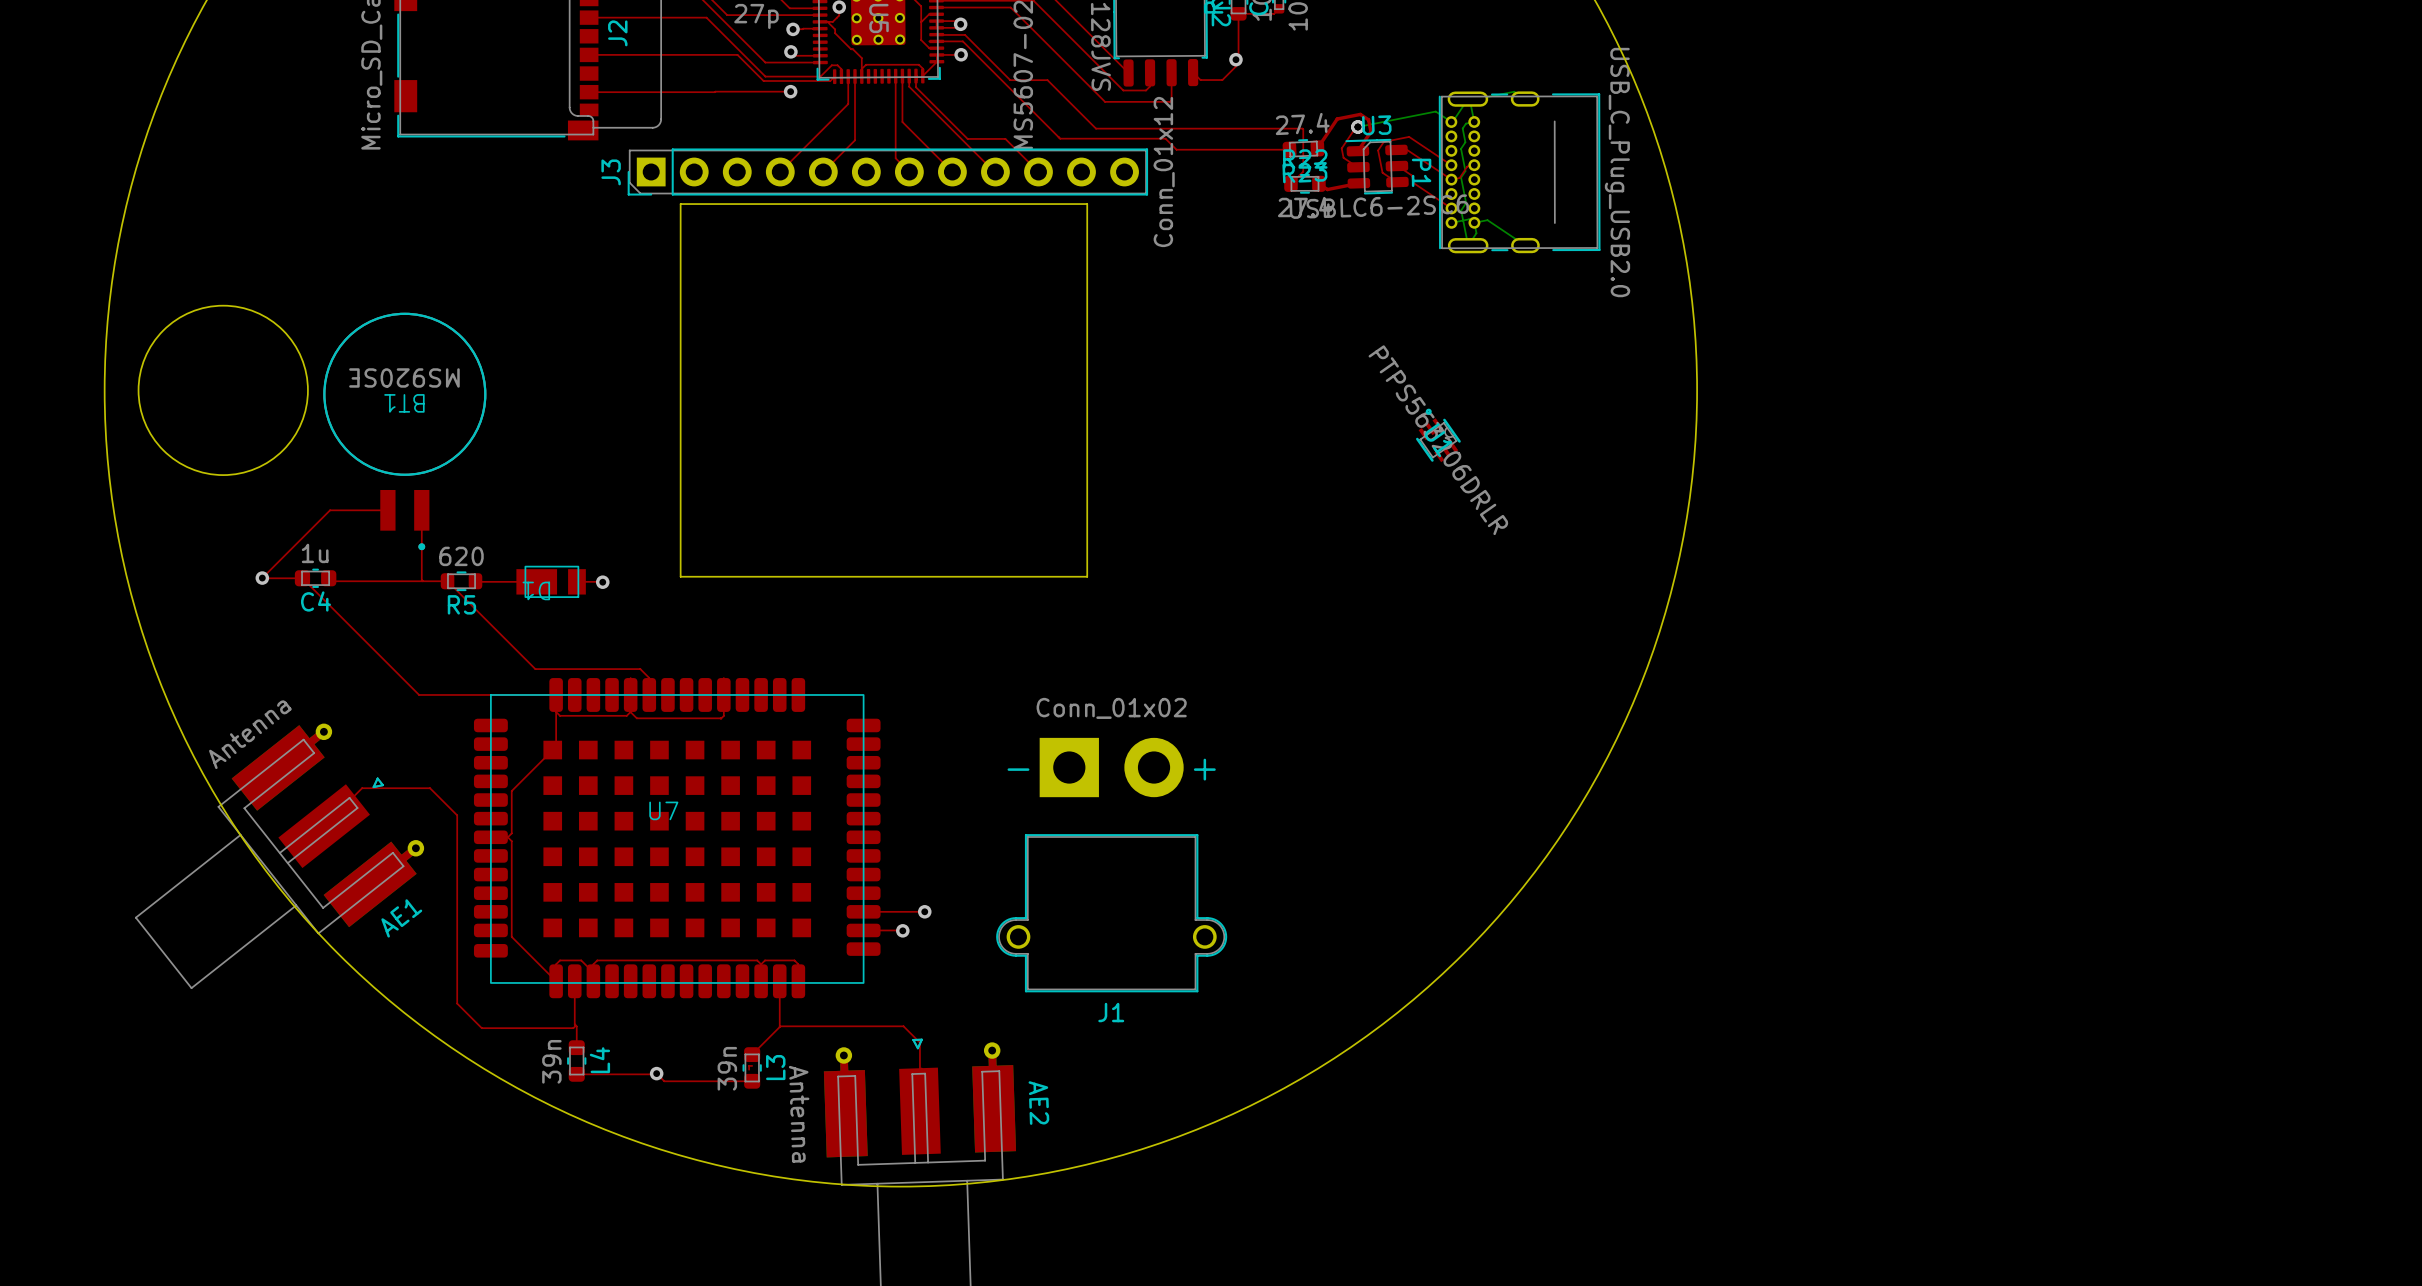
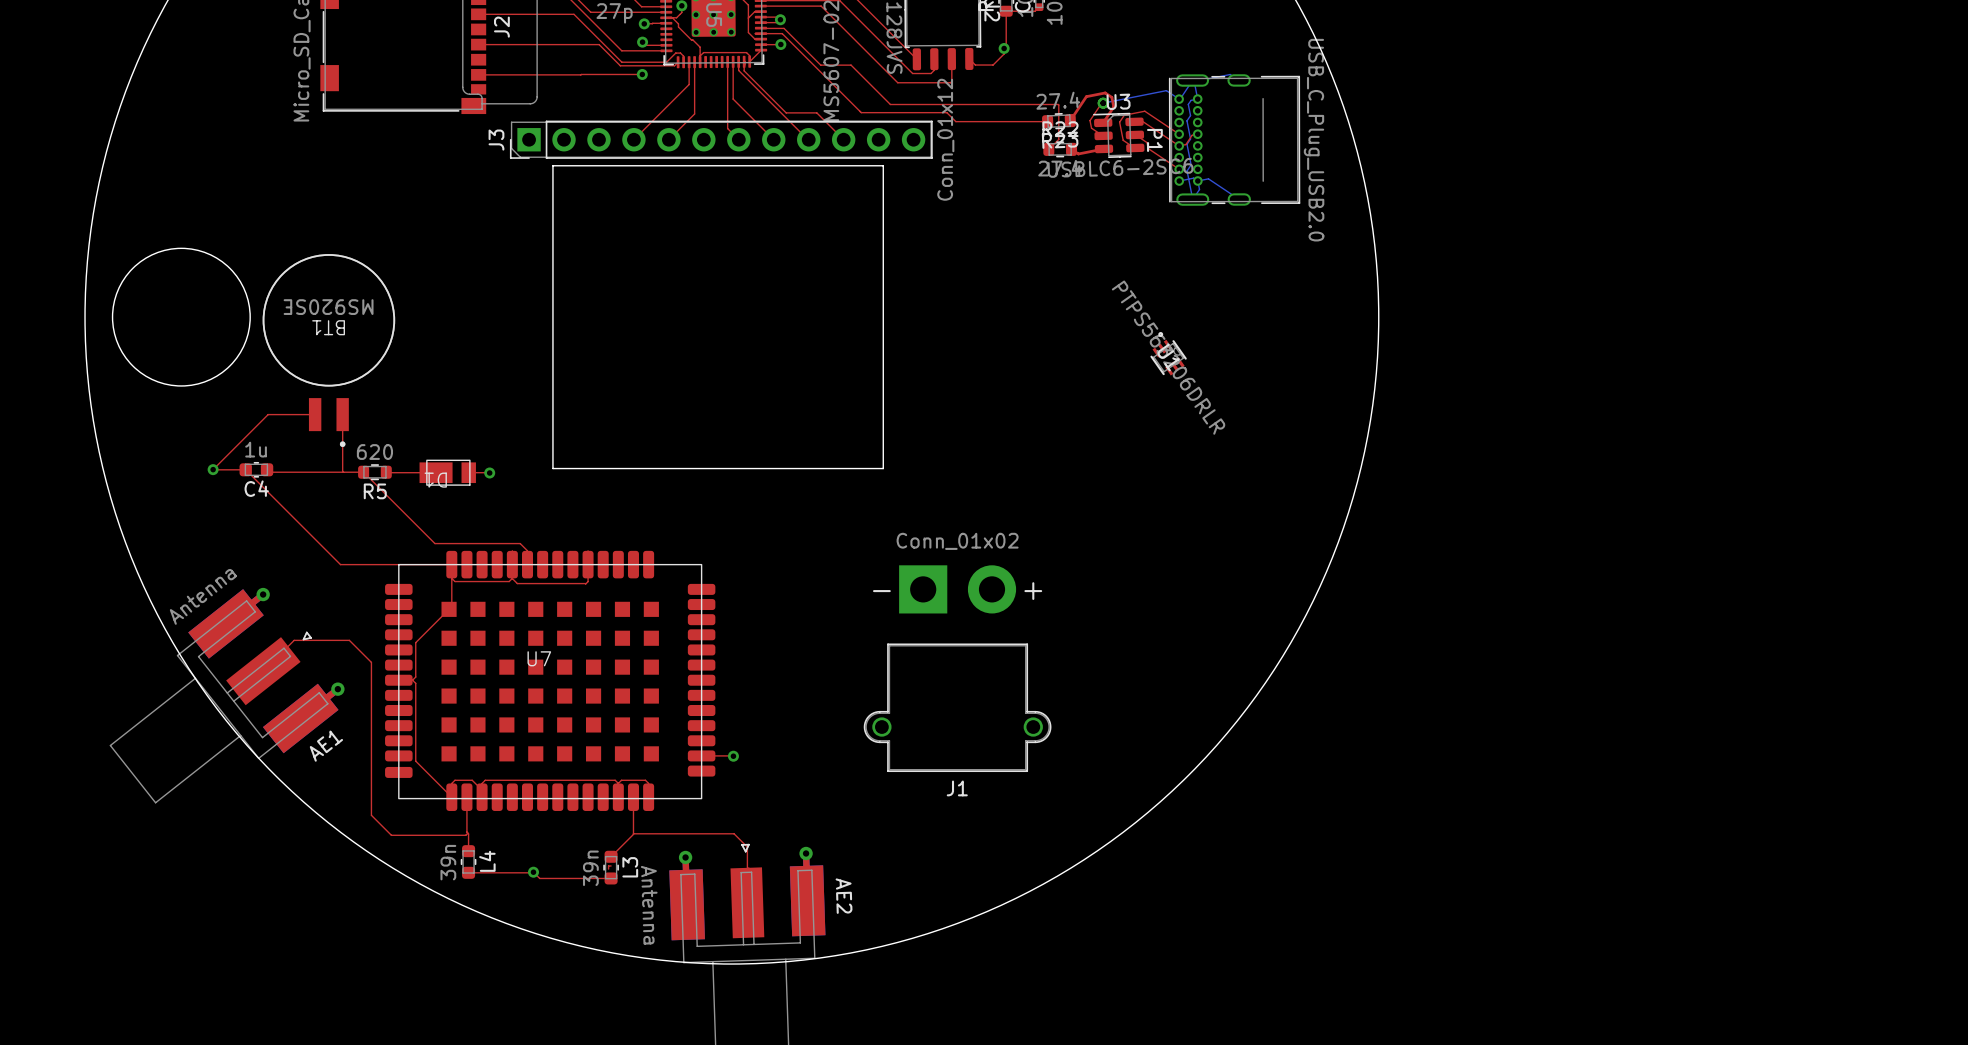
J1 position: (1111, 865) -> (957, 668)
top track: (863, 911) (924, 911) -> none
via: (924, 911) -> none

